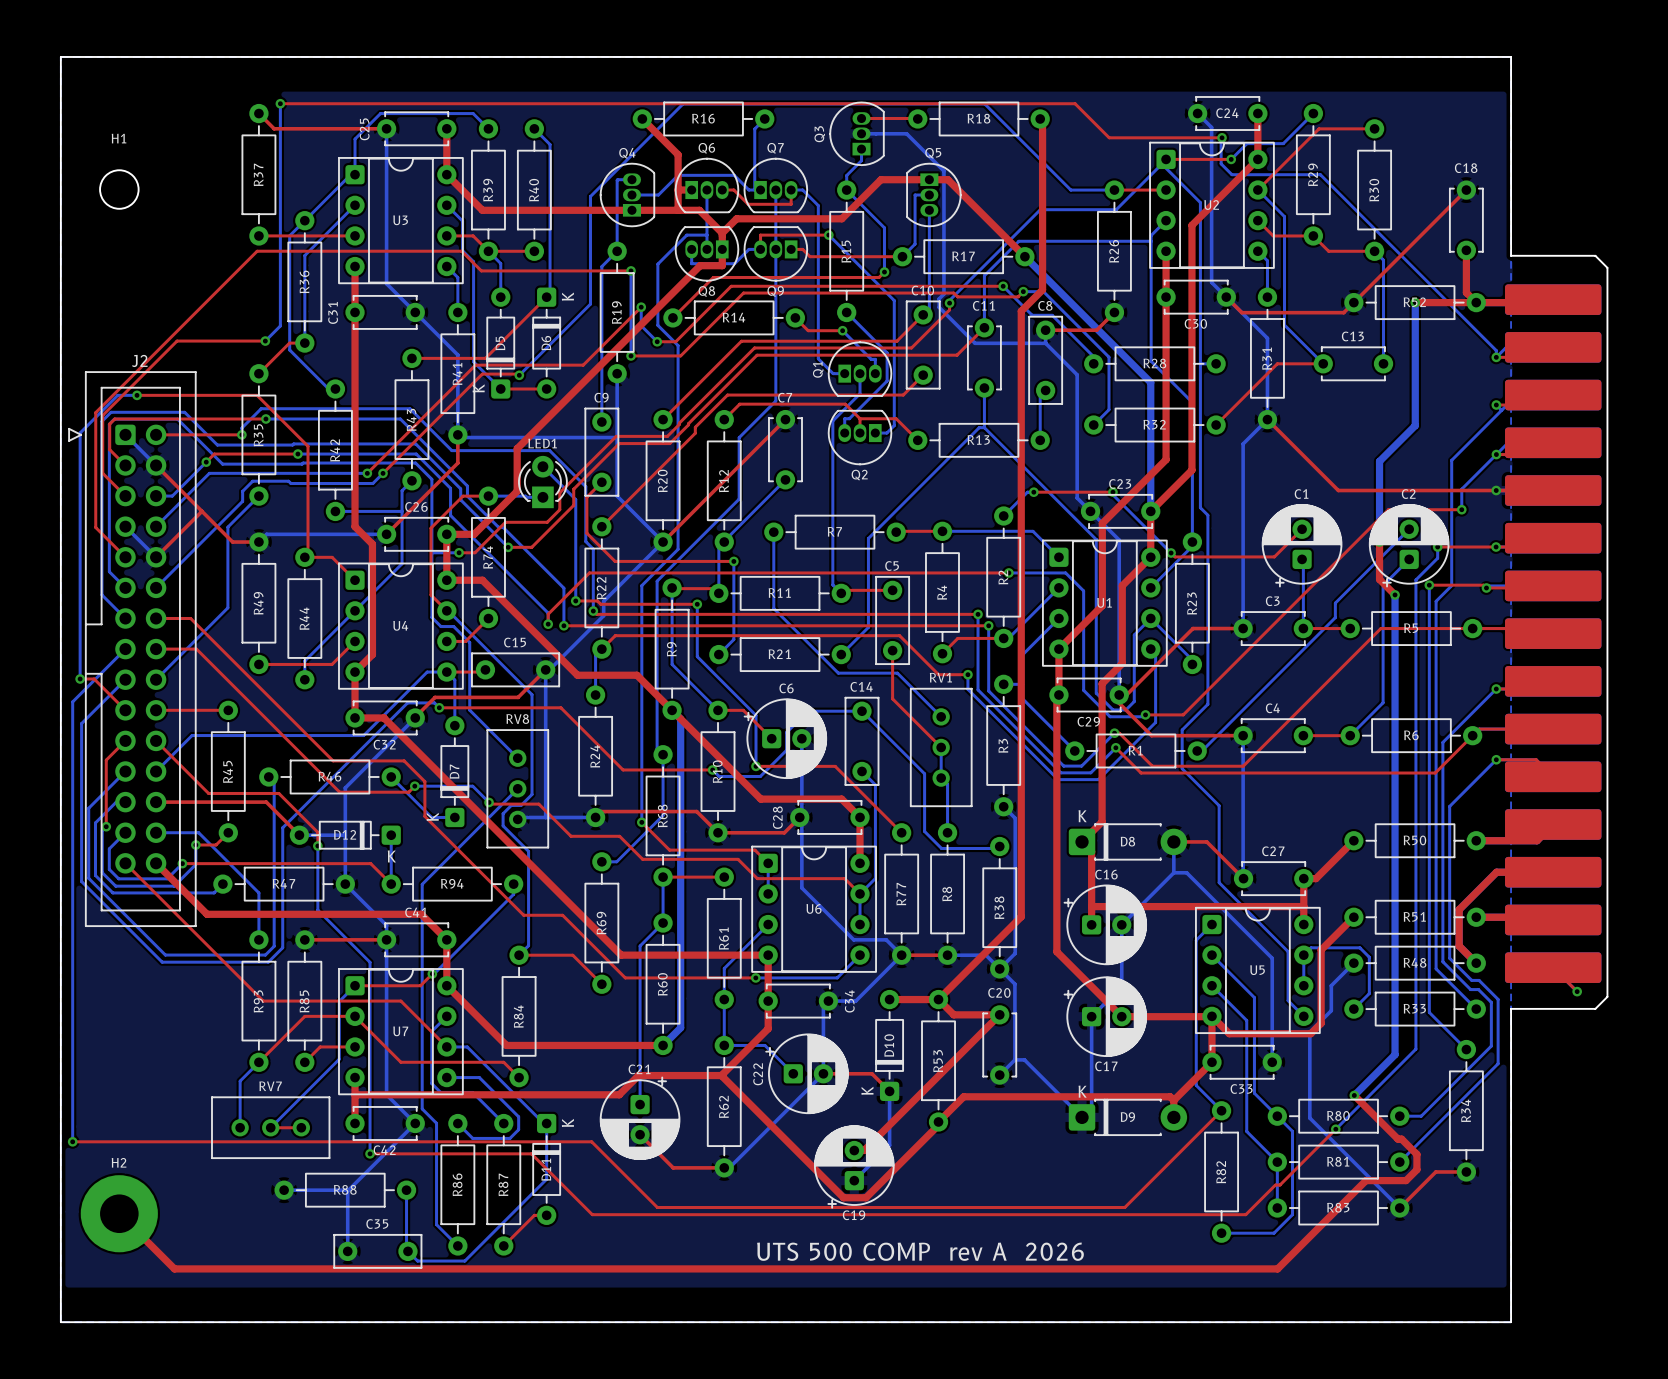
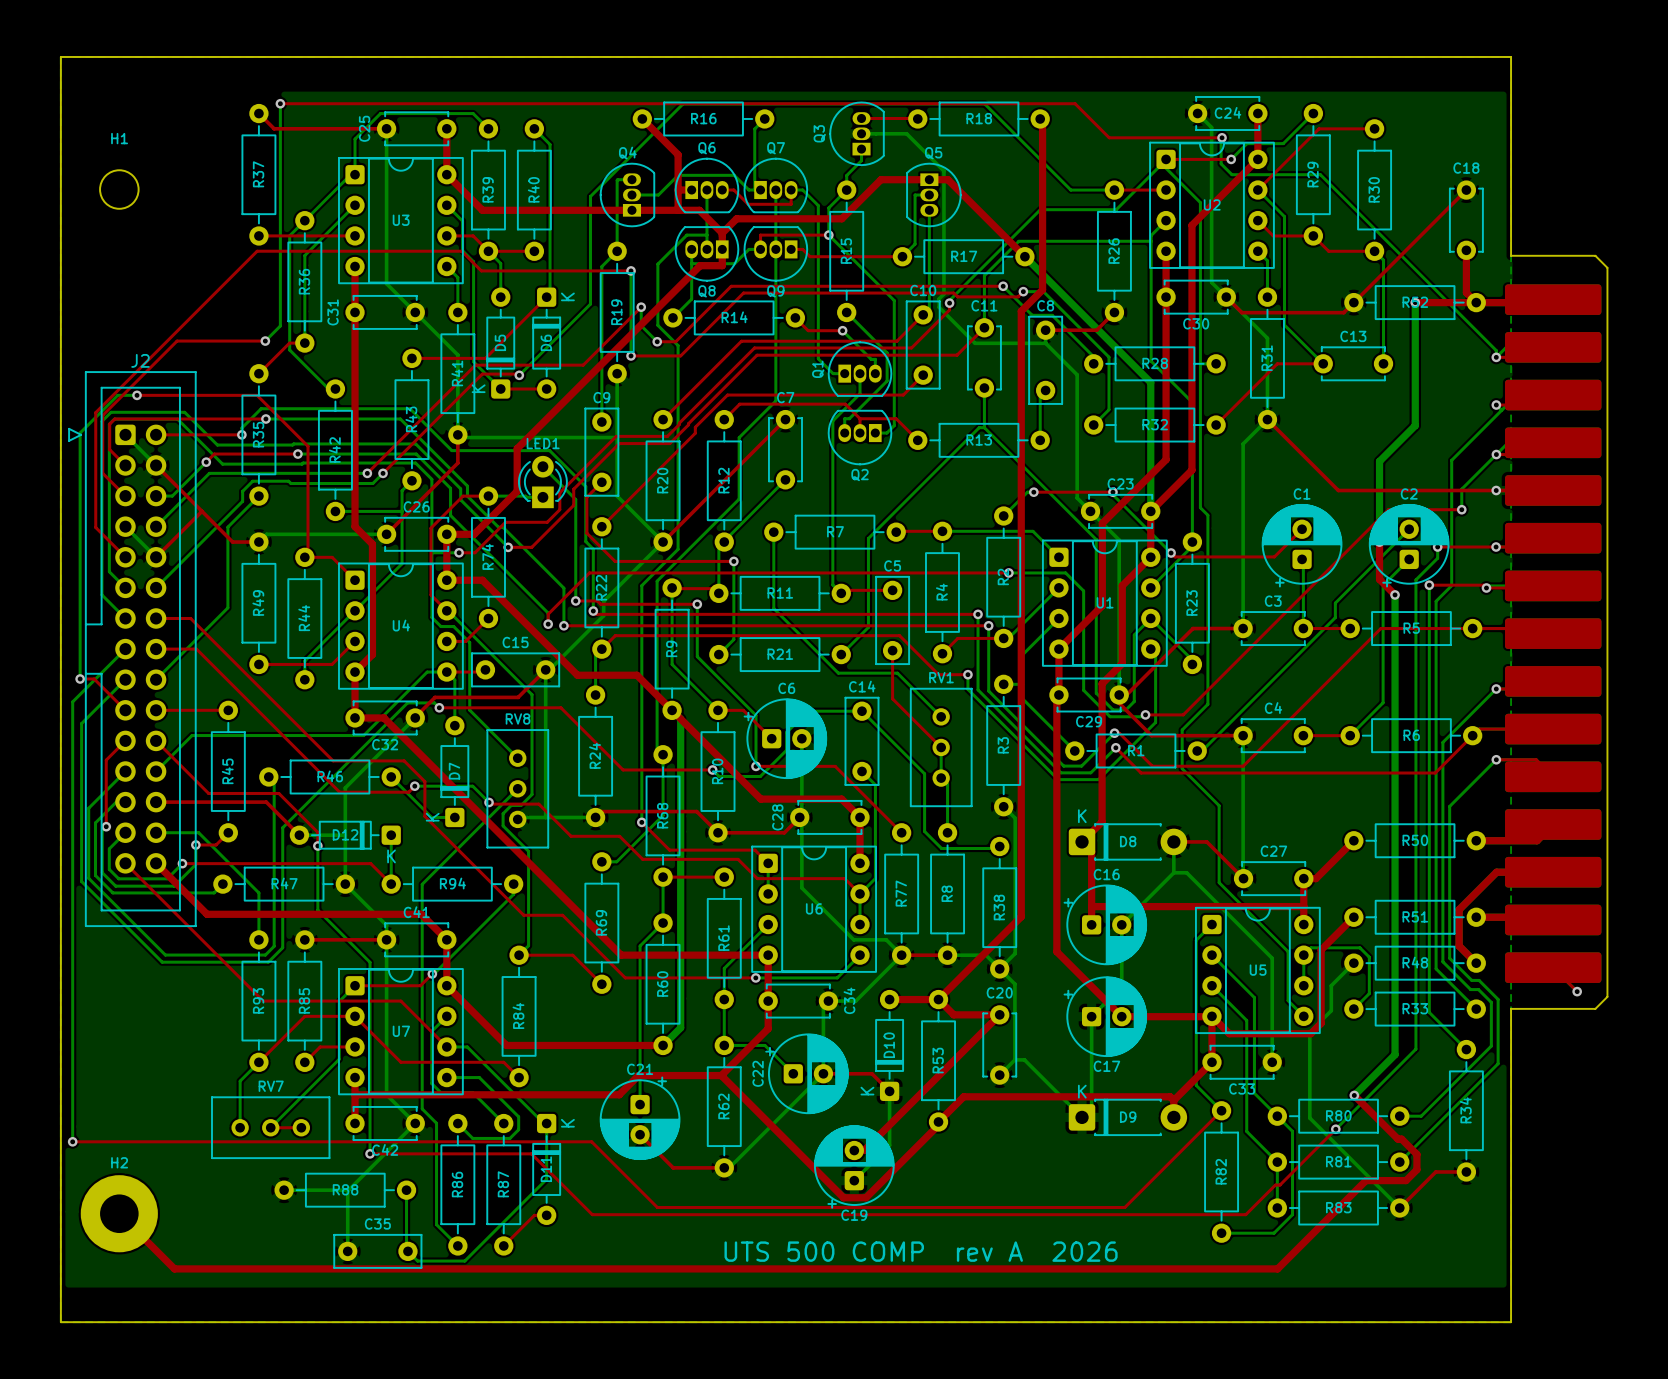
bottom track: (846, 190) (884, 227) (884, 272) -> (846, 190) (828, 207) (828, 235)
bottom track: none -> (691, 263) (691, 299) (672, 317)
top track: (884, 272) (879, 277) (713, 277) (672, 317) -> none
via: (884, 272) -> none

